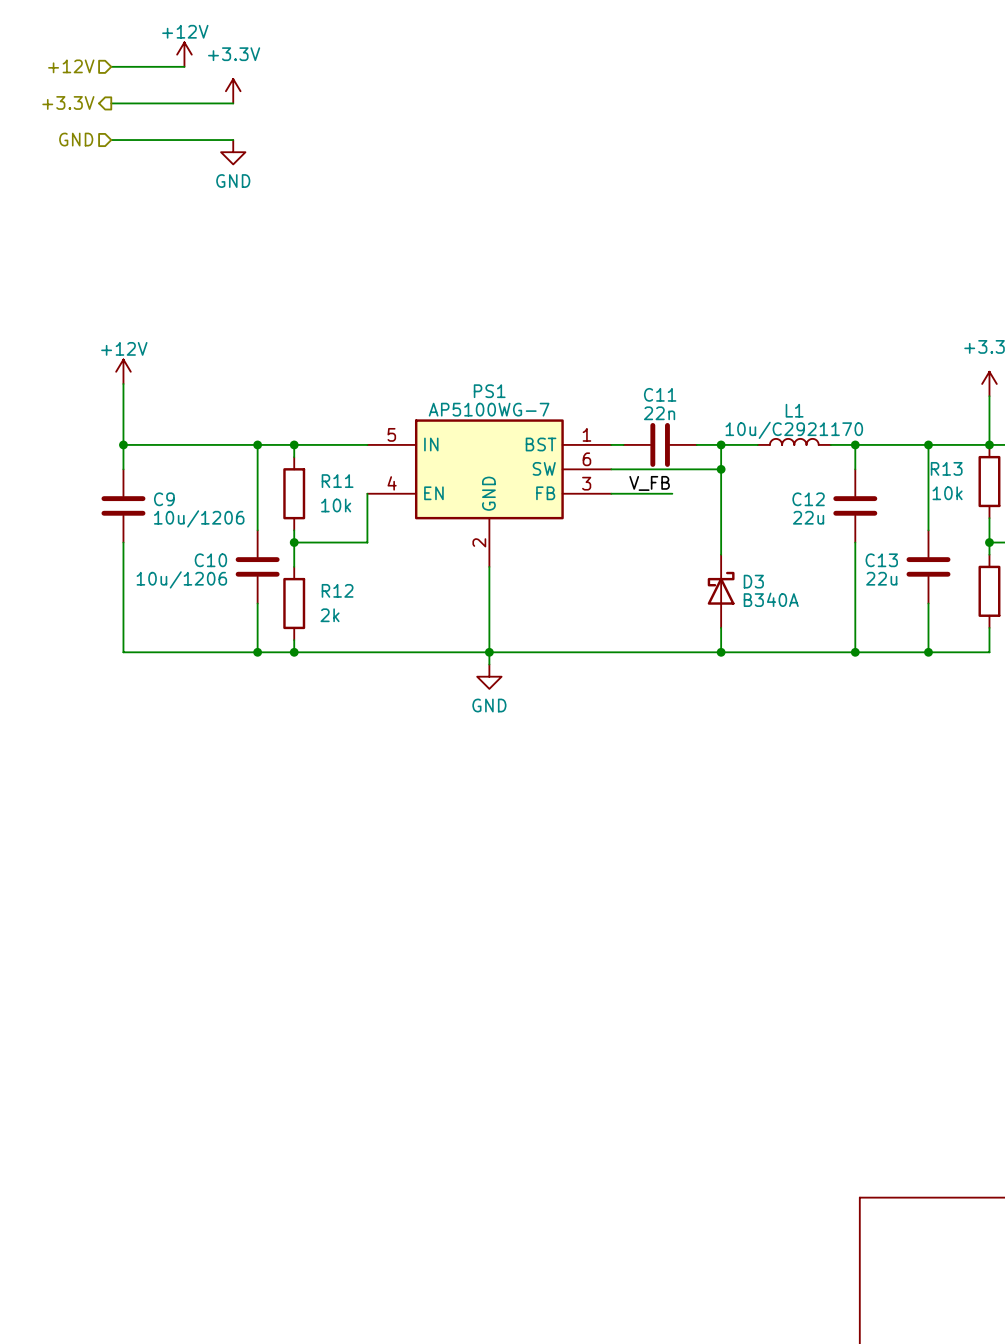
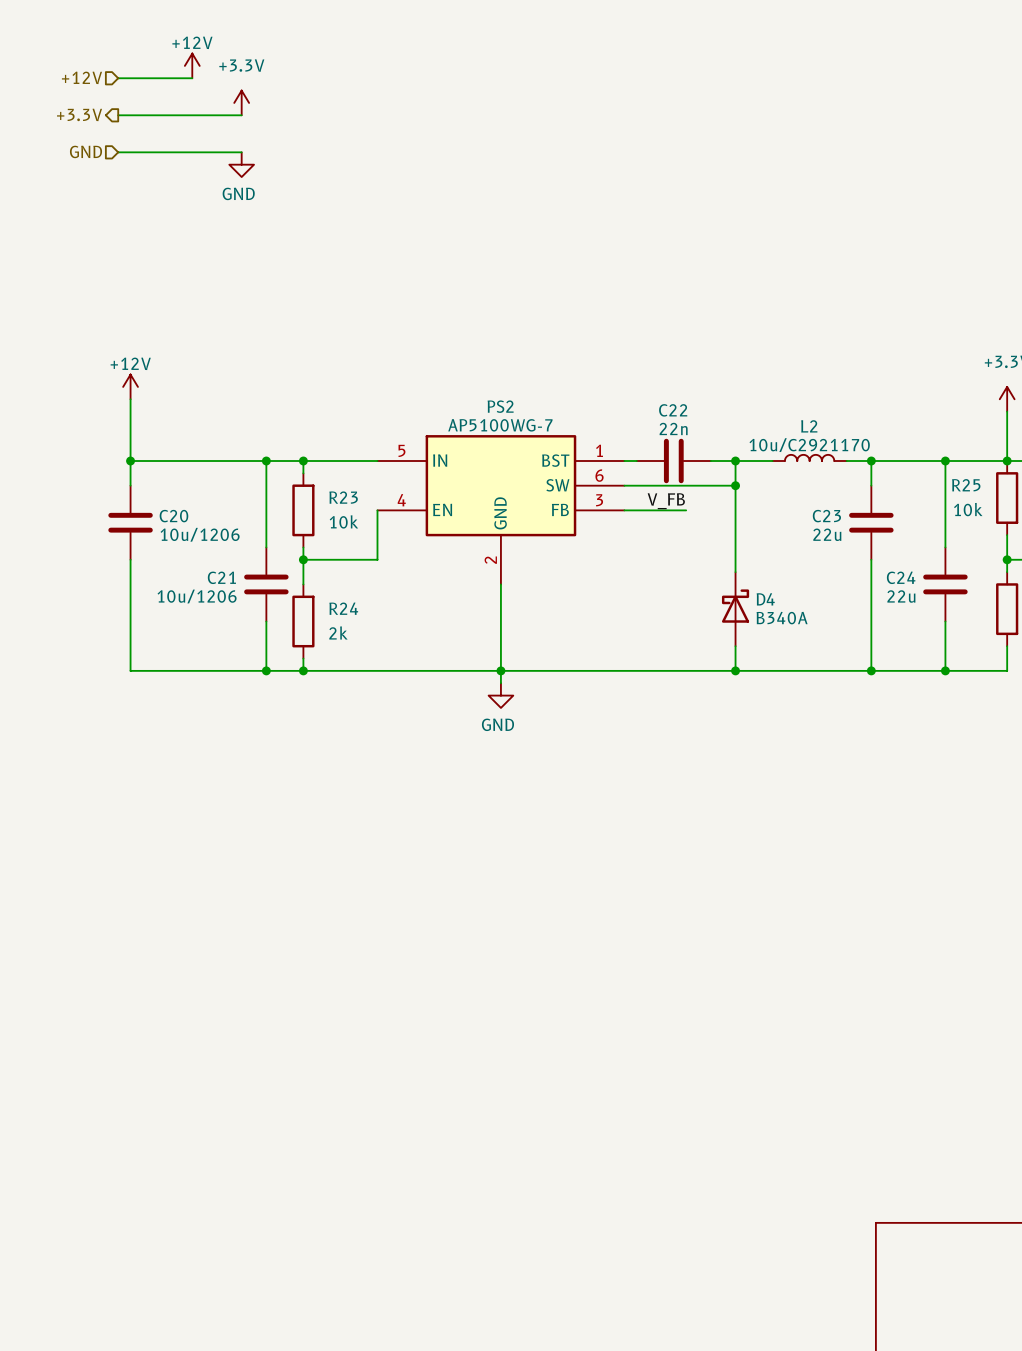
PS1 name: PS1 (489, 391) -> PS2 (500, 406)
C11 name: C11 (660, 394) -> C22 (673, 410)
L1 name: L1 (794, 410) -> L2 (809, 426)
R13 name: R13 (946, 468) -> R25 (966, 485)
R11 name: R11 (337, 481) -> R23 (343, 497)
C9 name: C9 (164, 499) -> C20 (173, 516)
C12 name: C12 (808, 499) -> C23 (826, 516)
C10 name: C10 (210, 560) -> C21 (221, 577)
C13 name: C13 (881, 560) -> C24 (901, 577)
D3 name: D3 (753, 581) -> D4 (765, 599)
R12 name: R12 (337, 590) -> R24 (343, 608)

